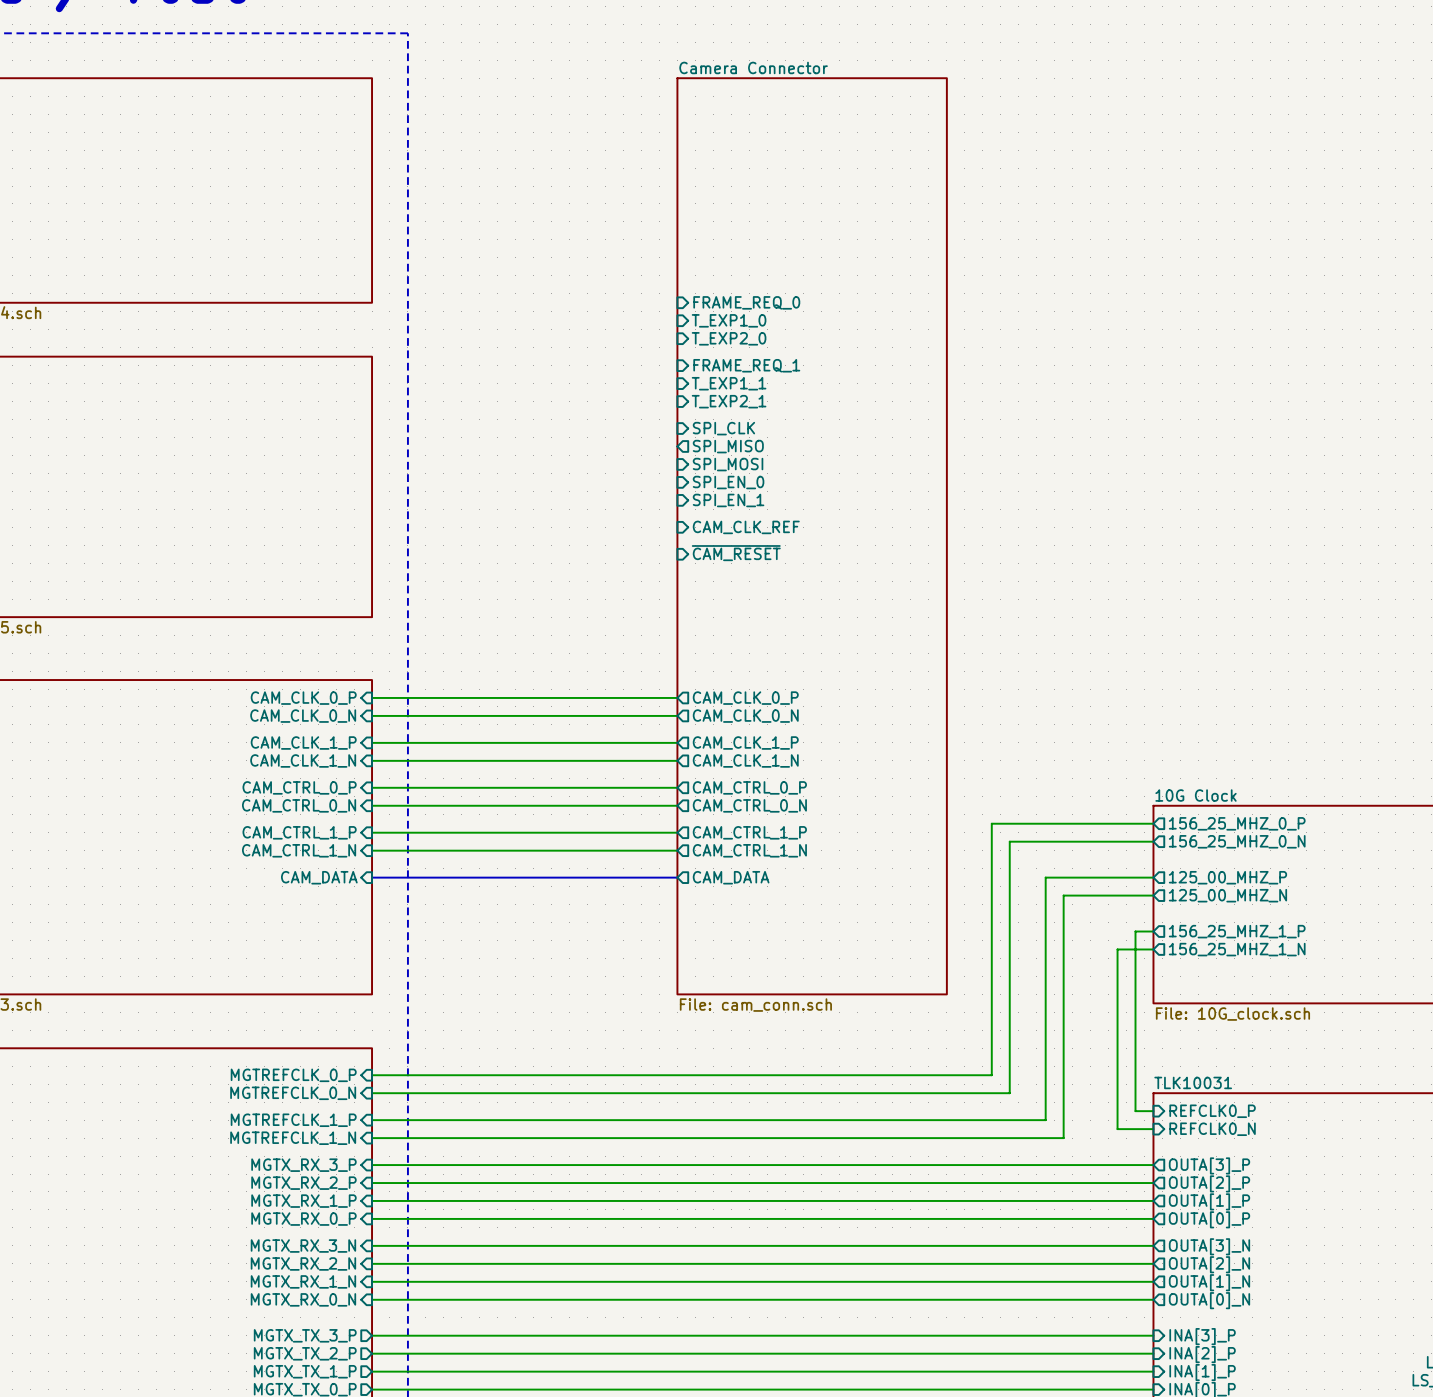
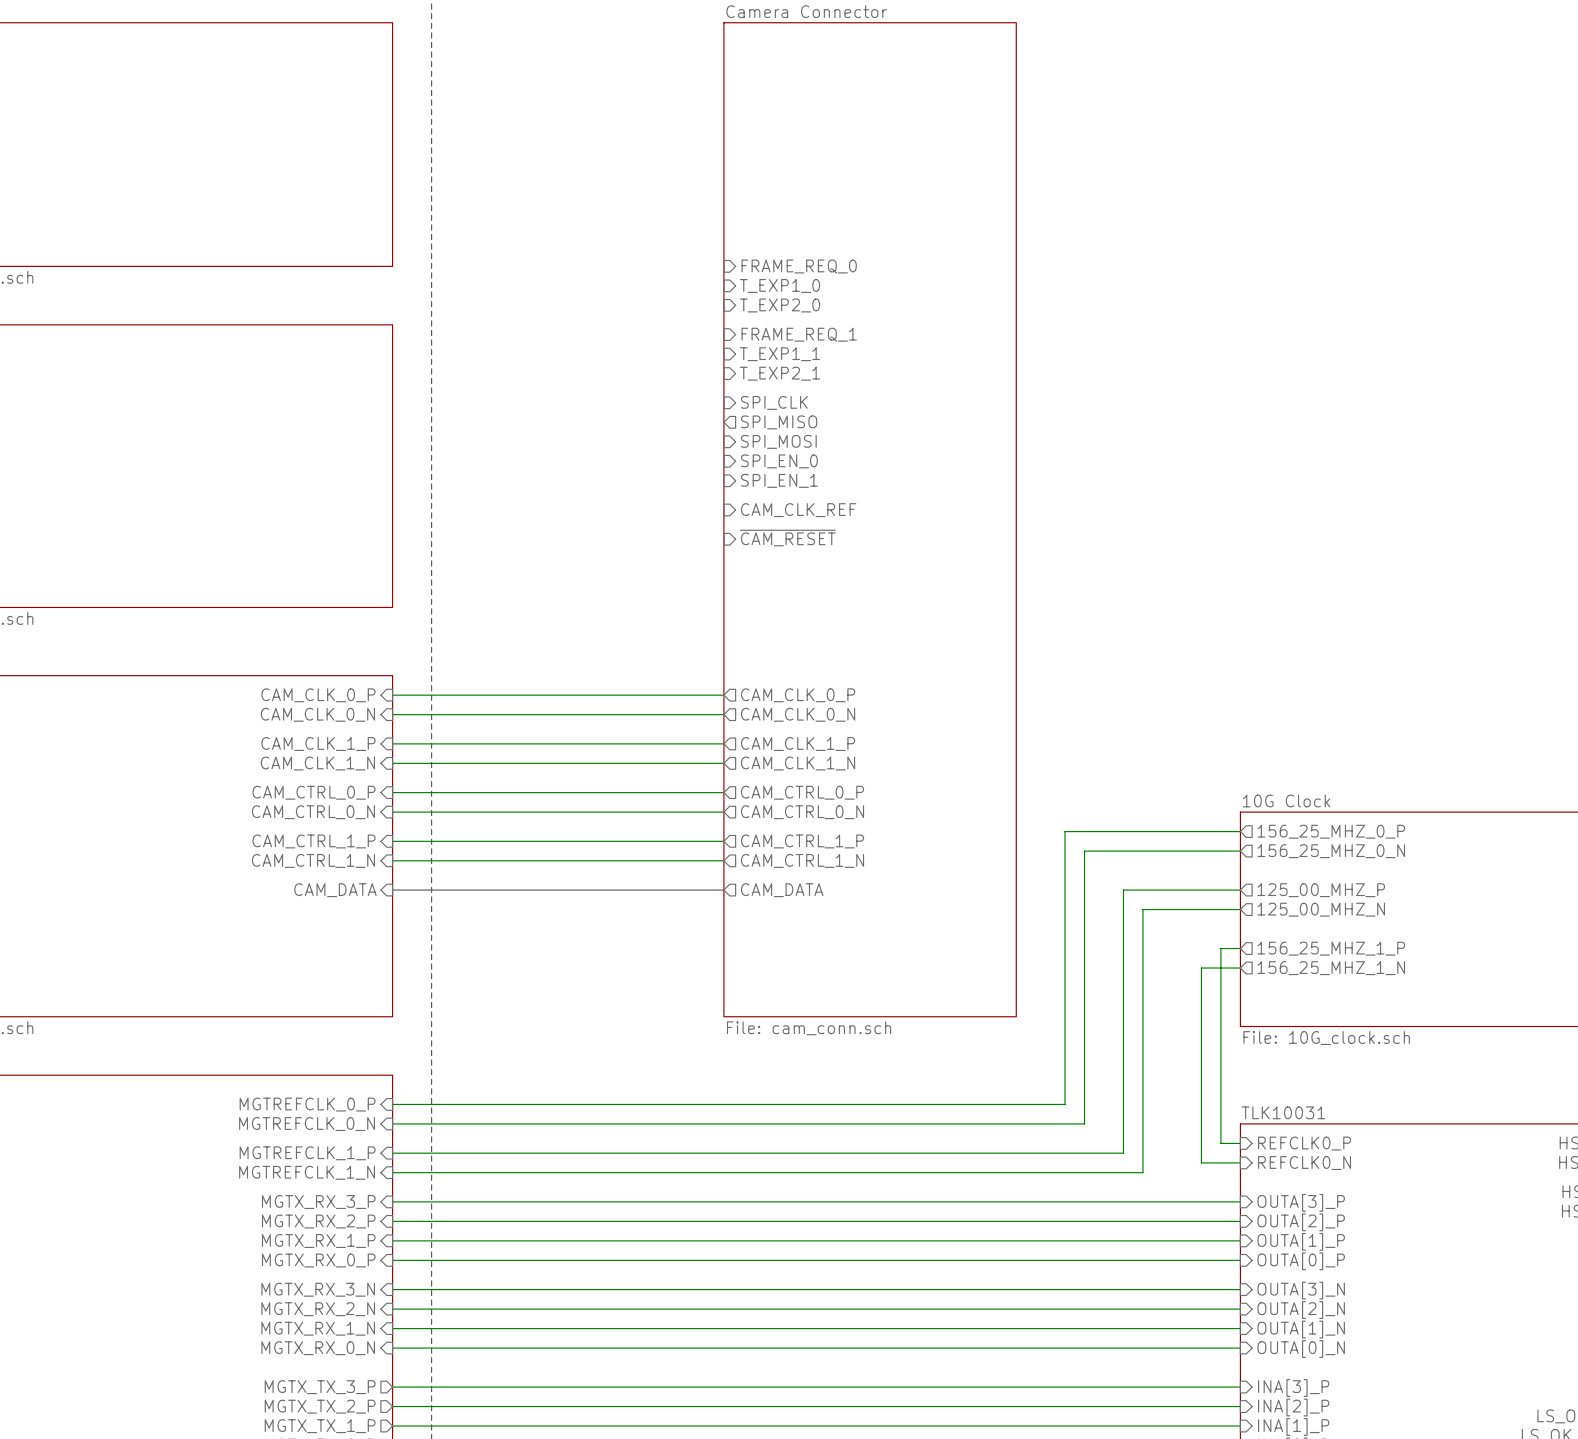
sheet pin shape: output (1209, 1165) -> input (1301, 1202)
sheet pin shape: output (1209, 1183) -> input (1301, 1222)
sheet pin shape: output (1209, 1201) -> input (1301, 1241)
sheet pin shape: output (1209, 1219) -> input (1301, 1261)
sheet pin shape: output (1209, 1246) -> input (1301, 1290)
sheet pin shape: output (1209, 1264) -> input (1301, 1310)
sheet pin shape: output (1209, 1282) -> input (1301, 1329)
sheet pin shape: output (1209, 1300) -> input (1301, 1349)

